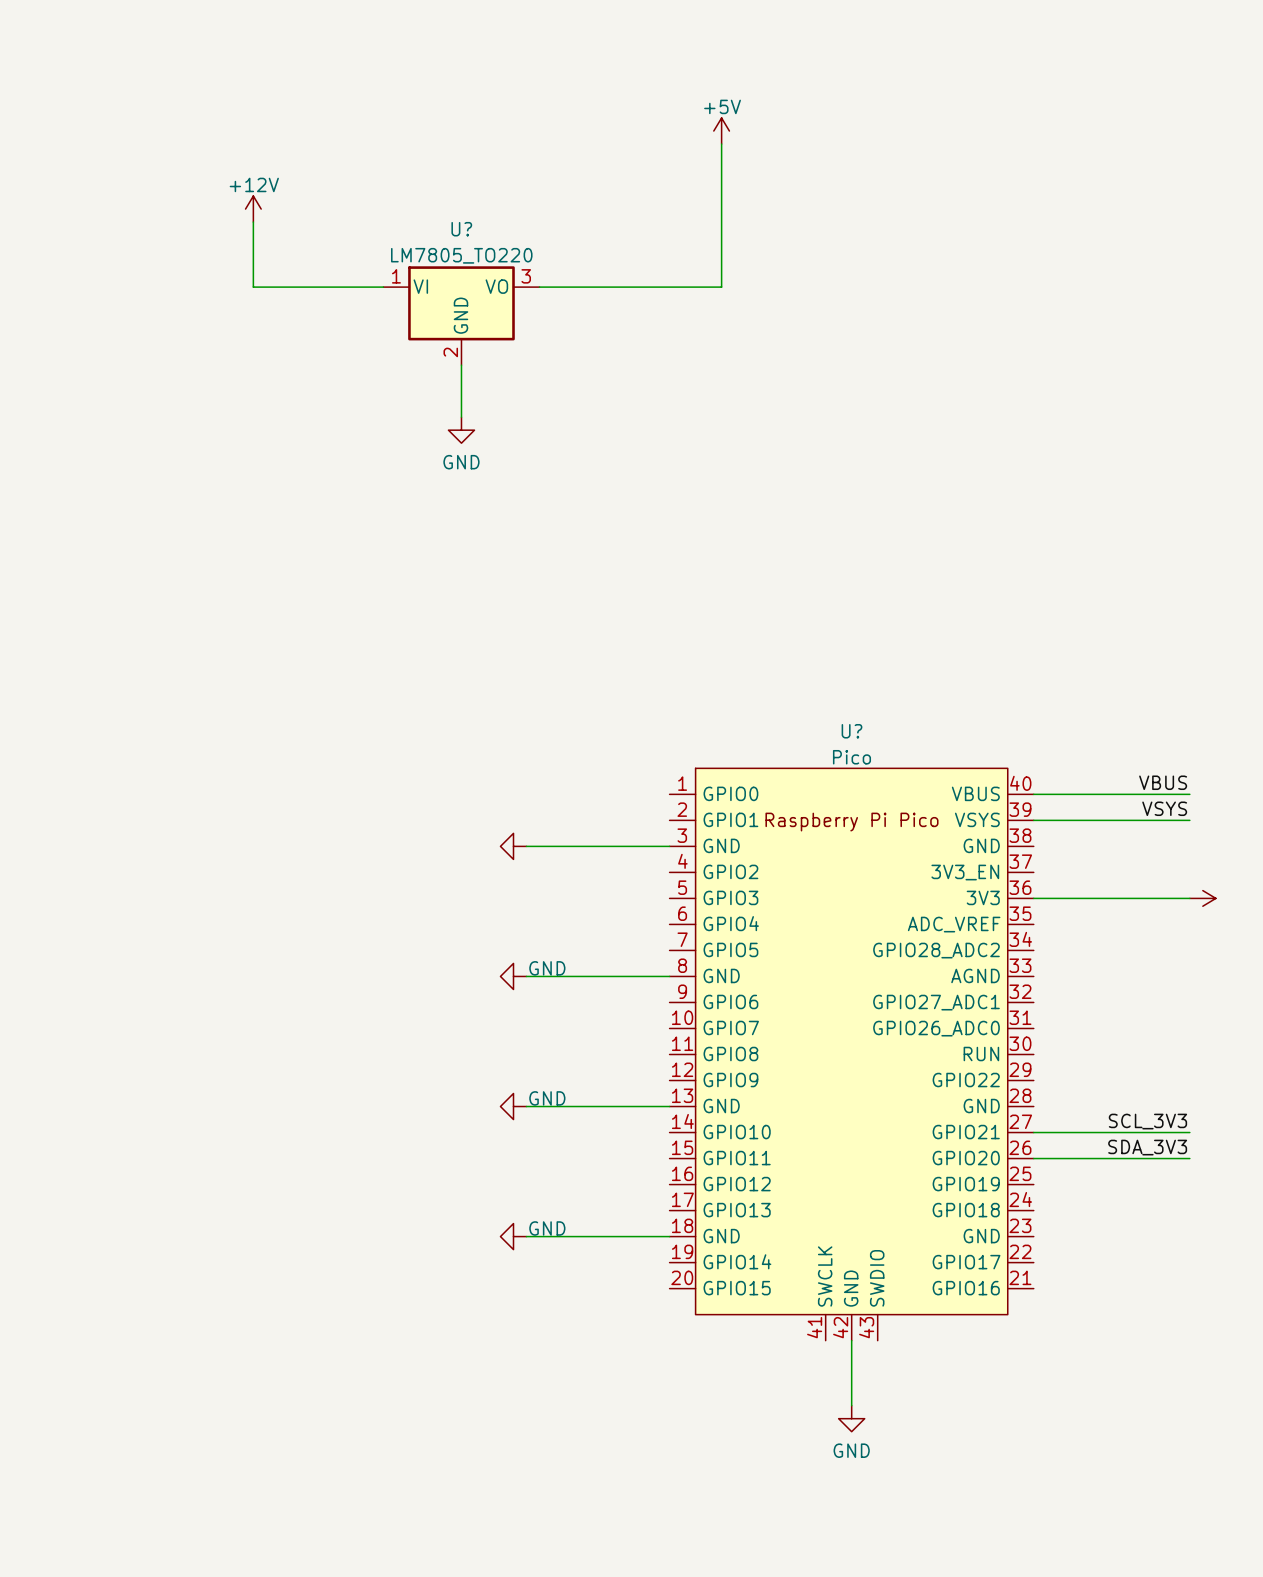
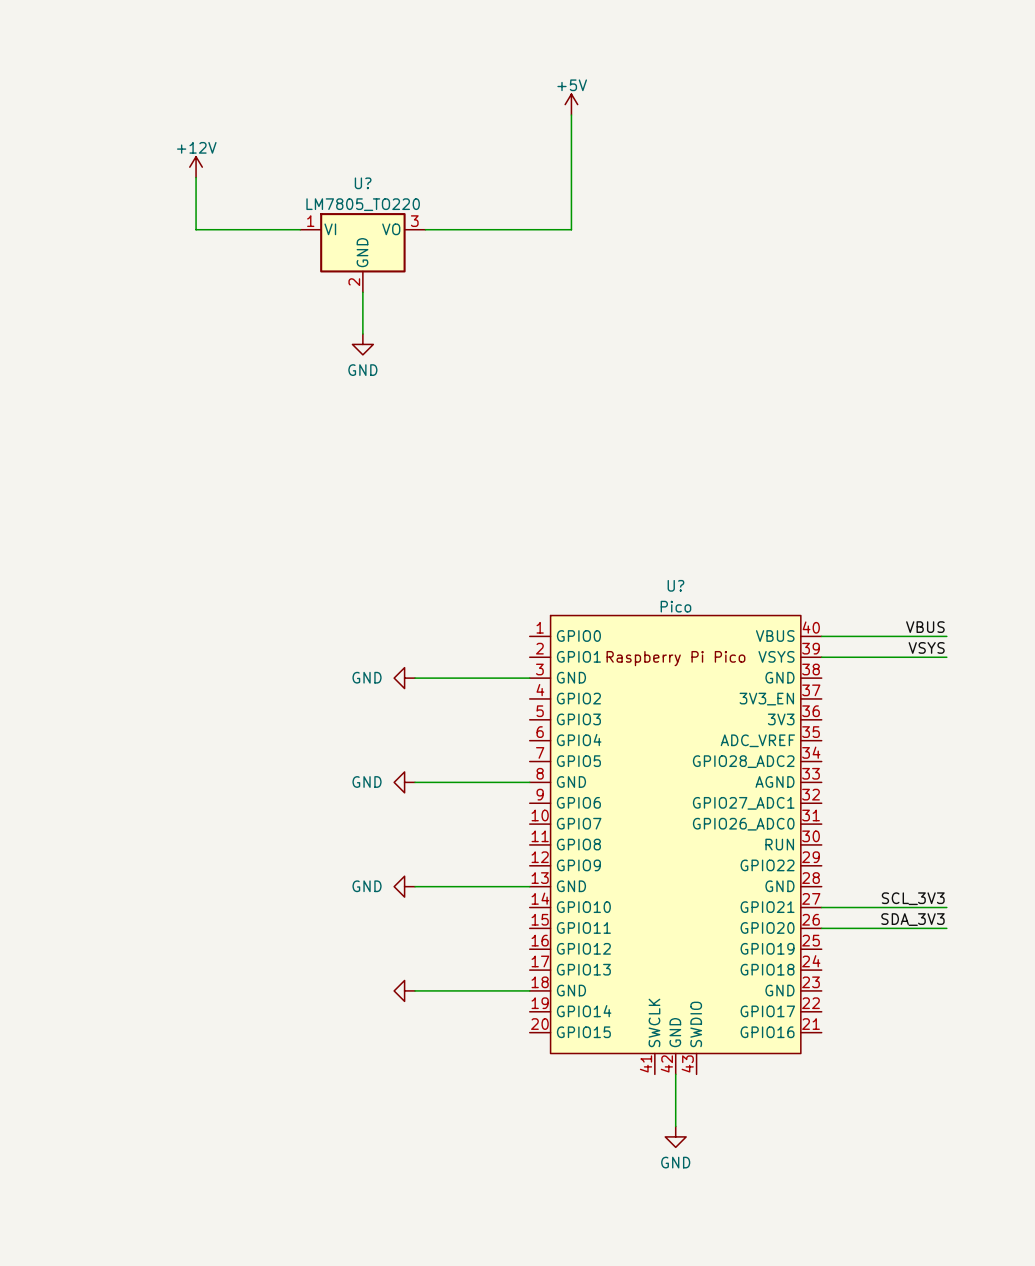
power symbol text: none -> GND (367, 677)
wire: (1033, 898) (1189, 898) -> none
power symbol: (1202, 898) -> none
power symbol text position: GND (547, 968) -> GND (367, 781)
power symbol text position: GND (547, 1098) -> GND (367, 886)
power symbol text: GND (547, 1228) -> none

